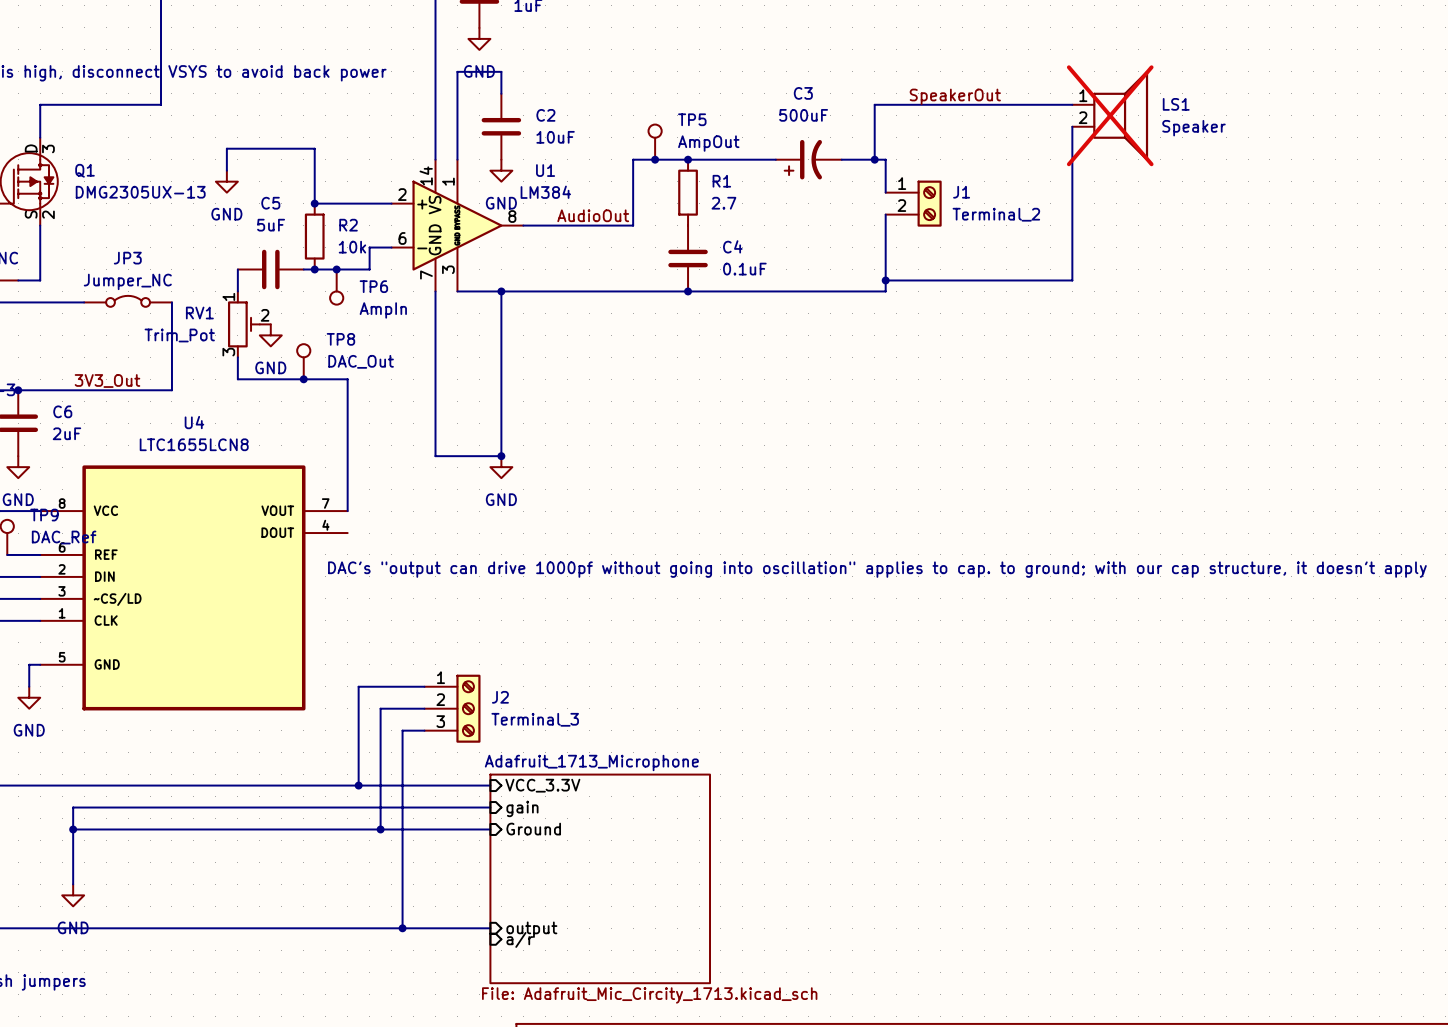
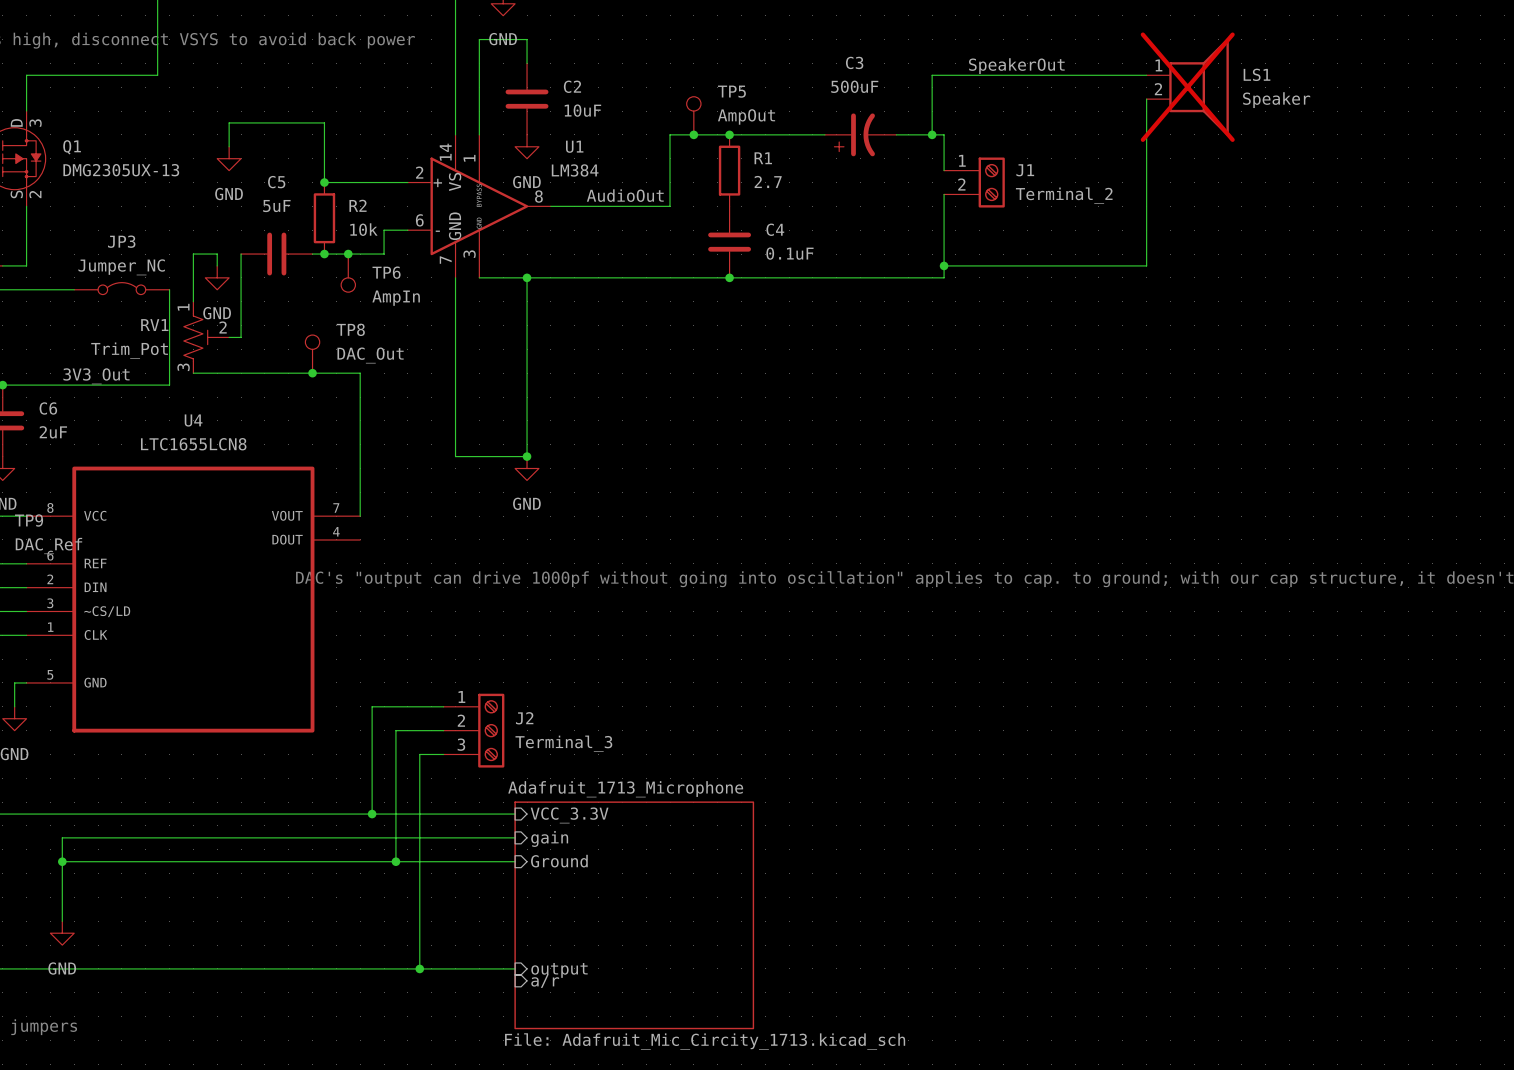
wire: none -> (217, 265) (217, 254) (193, 254) (193, 301)
RV1 symbol: [227, 291, 271, 358] -> [183, 301, 230, 374]
wire: none -> (241, 277) (241, 337) (229, 337)
power symbol position: GND (270, 335) -> GND (217, 277)
wire: (237, 357) (237, 379) -> (193, 373) (241, 373)

